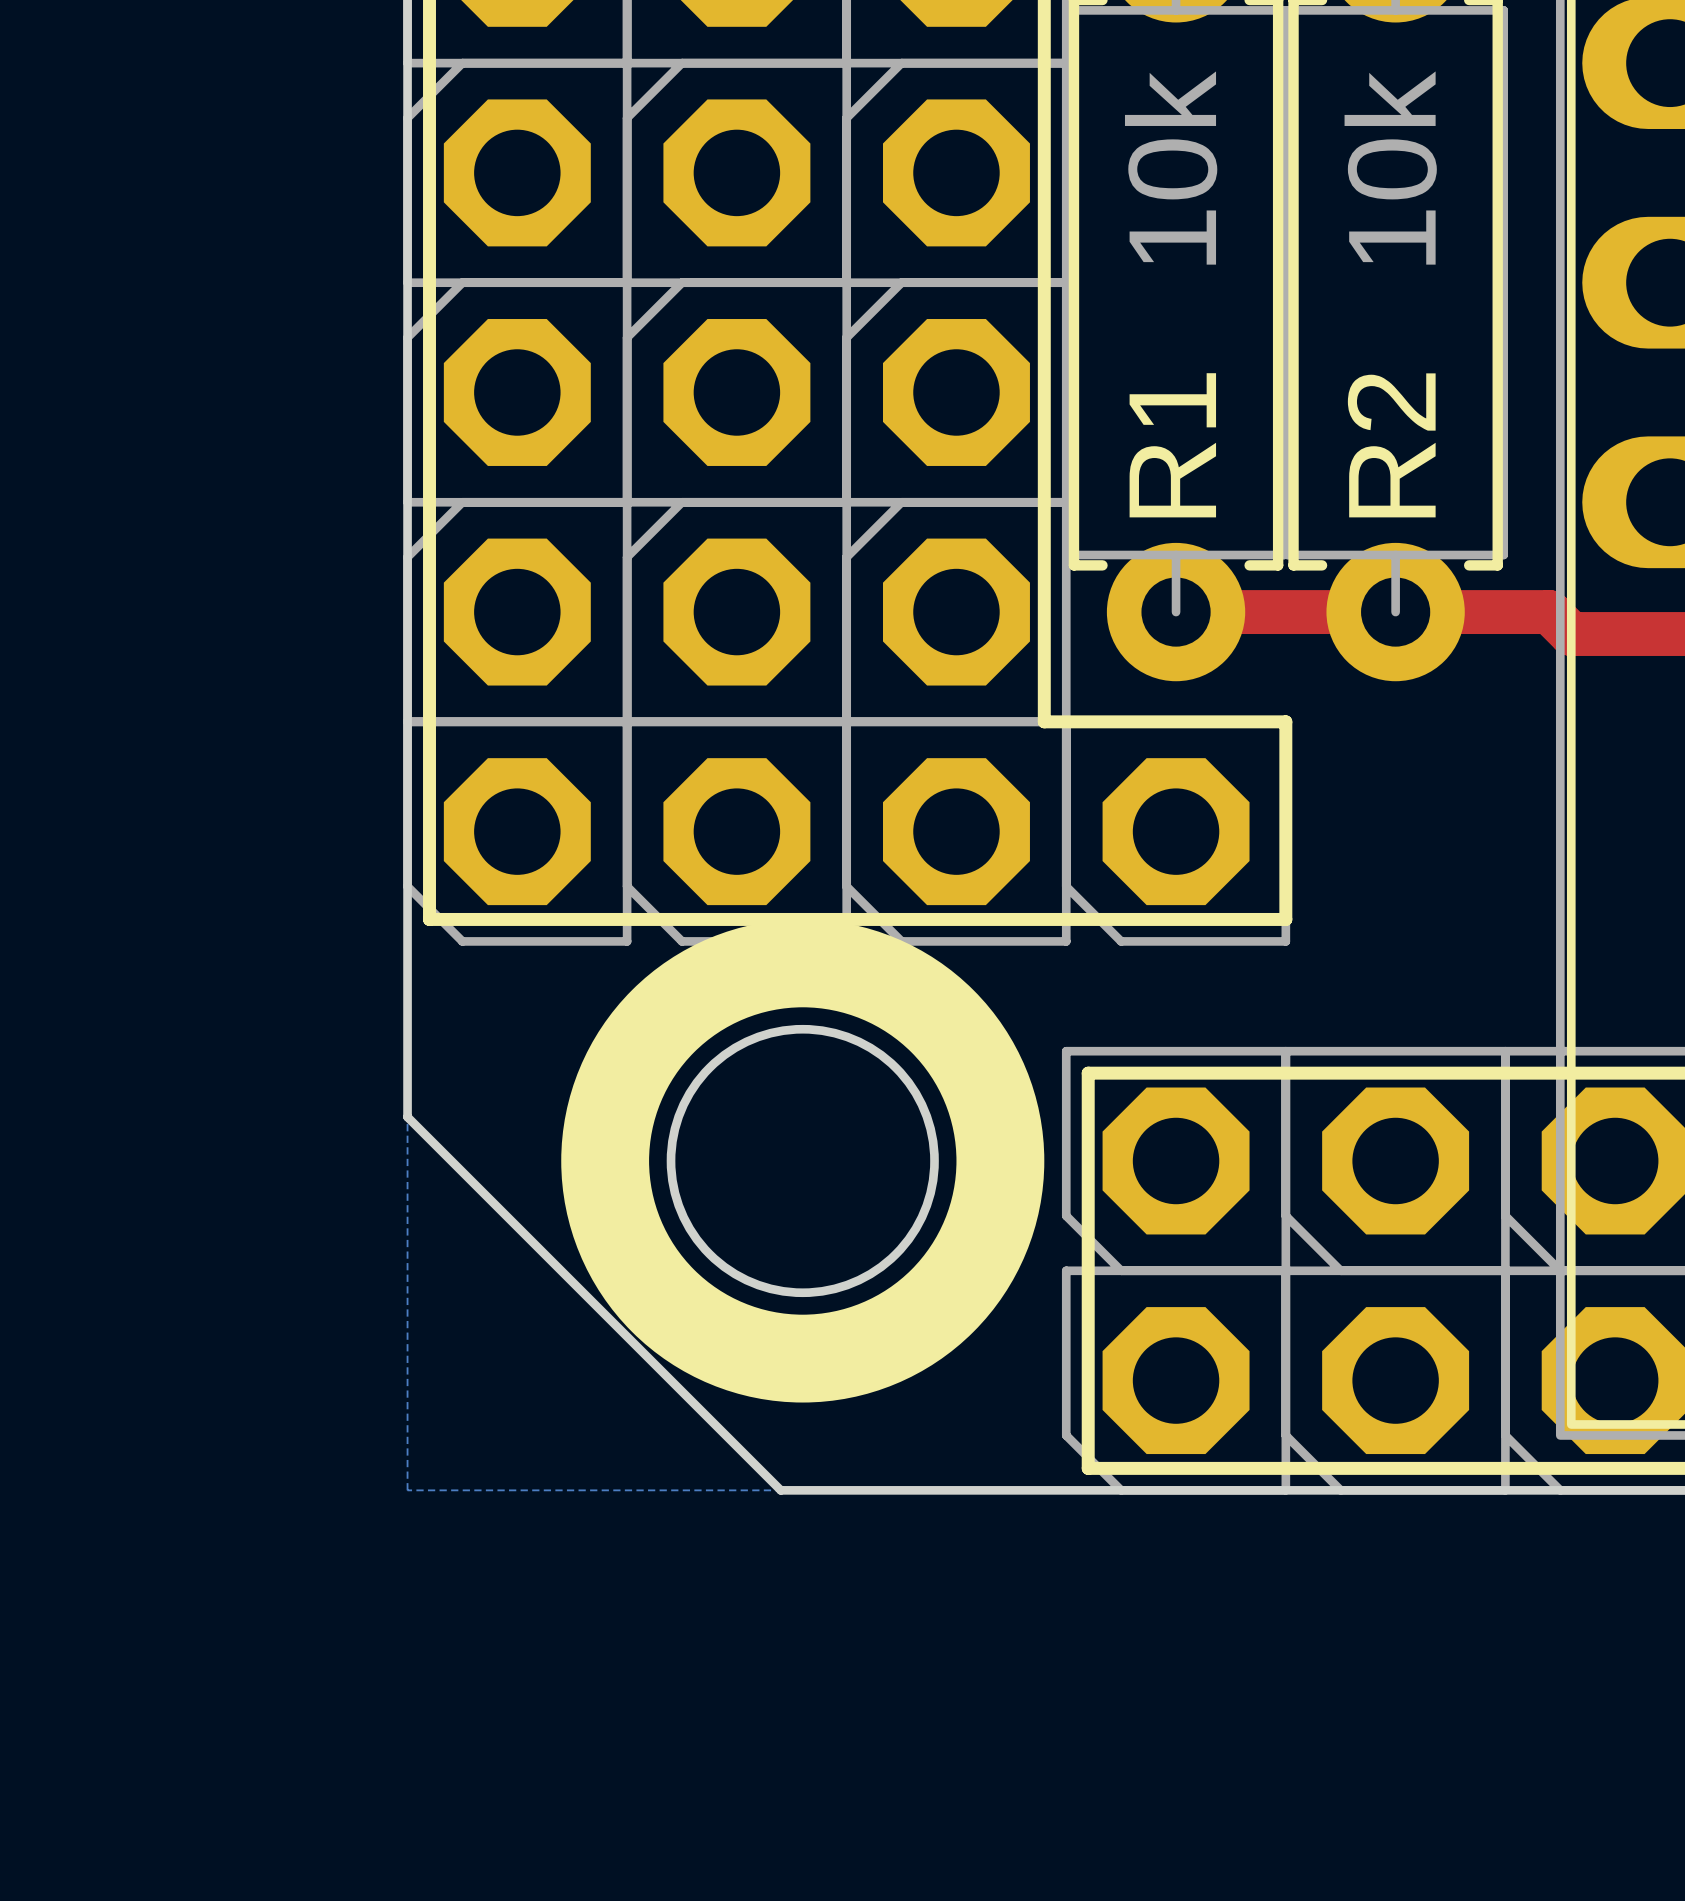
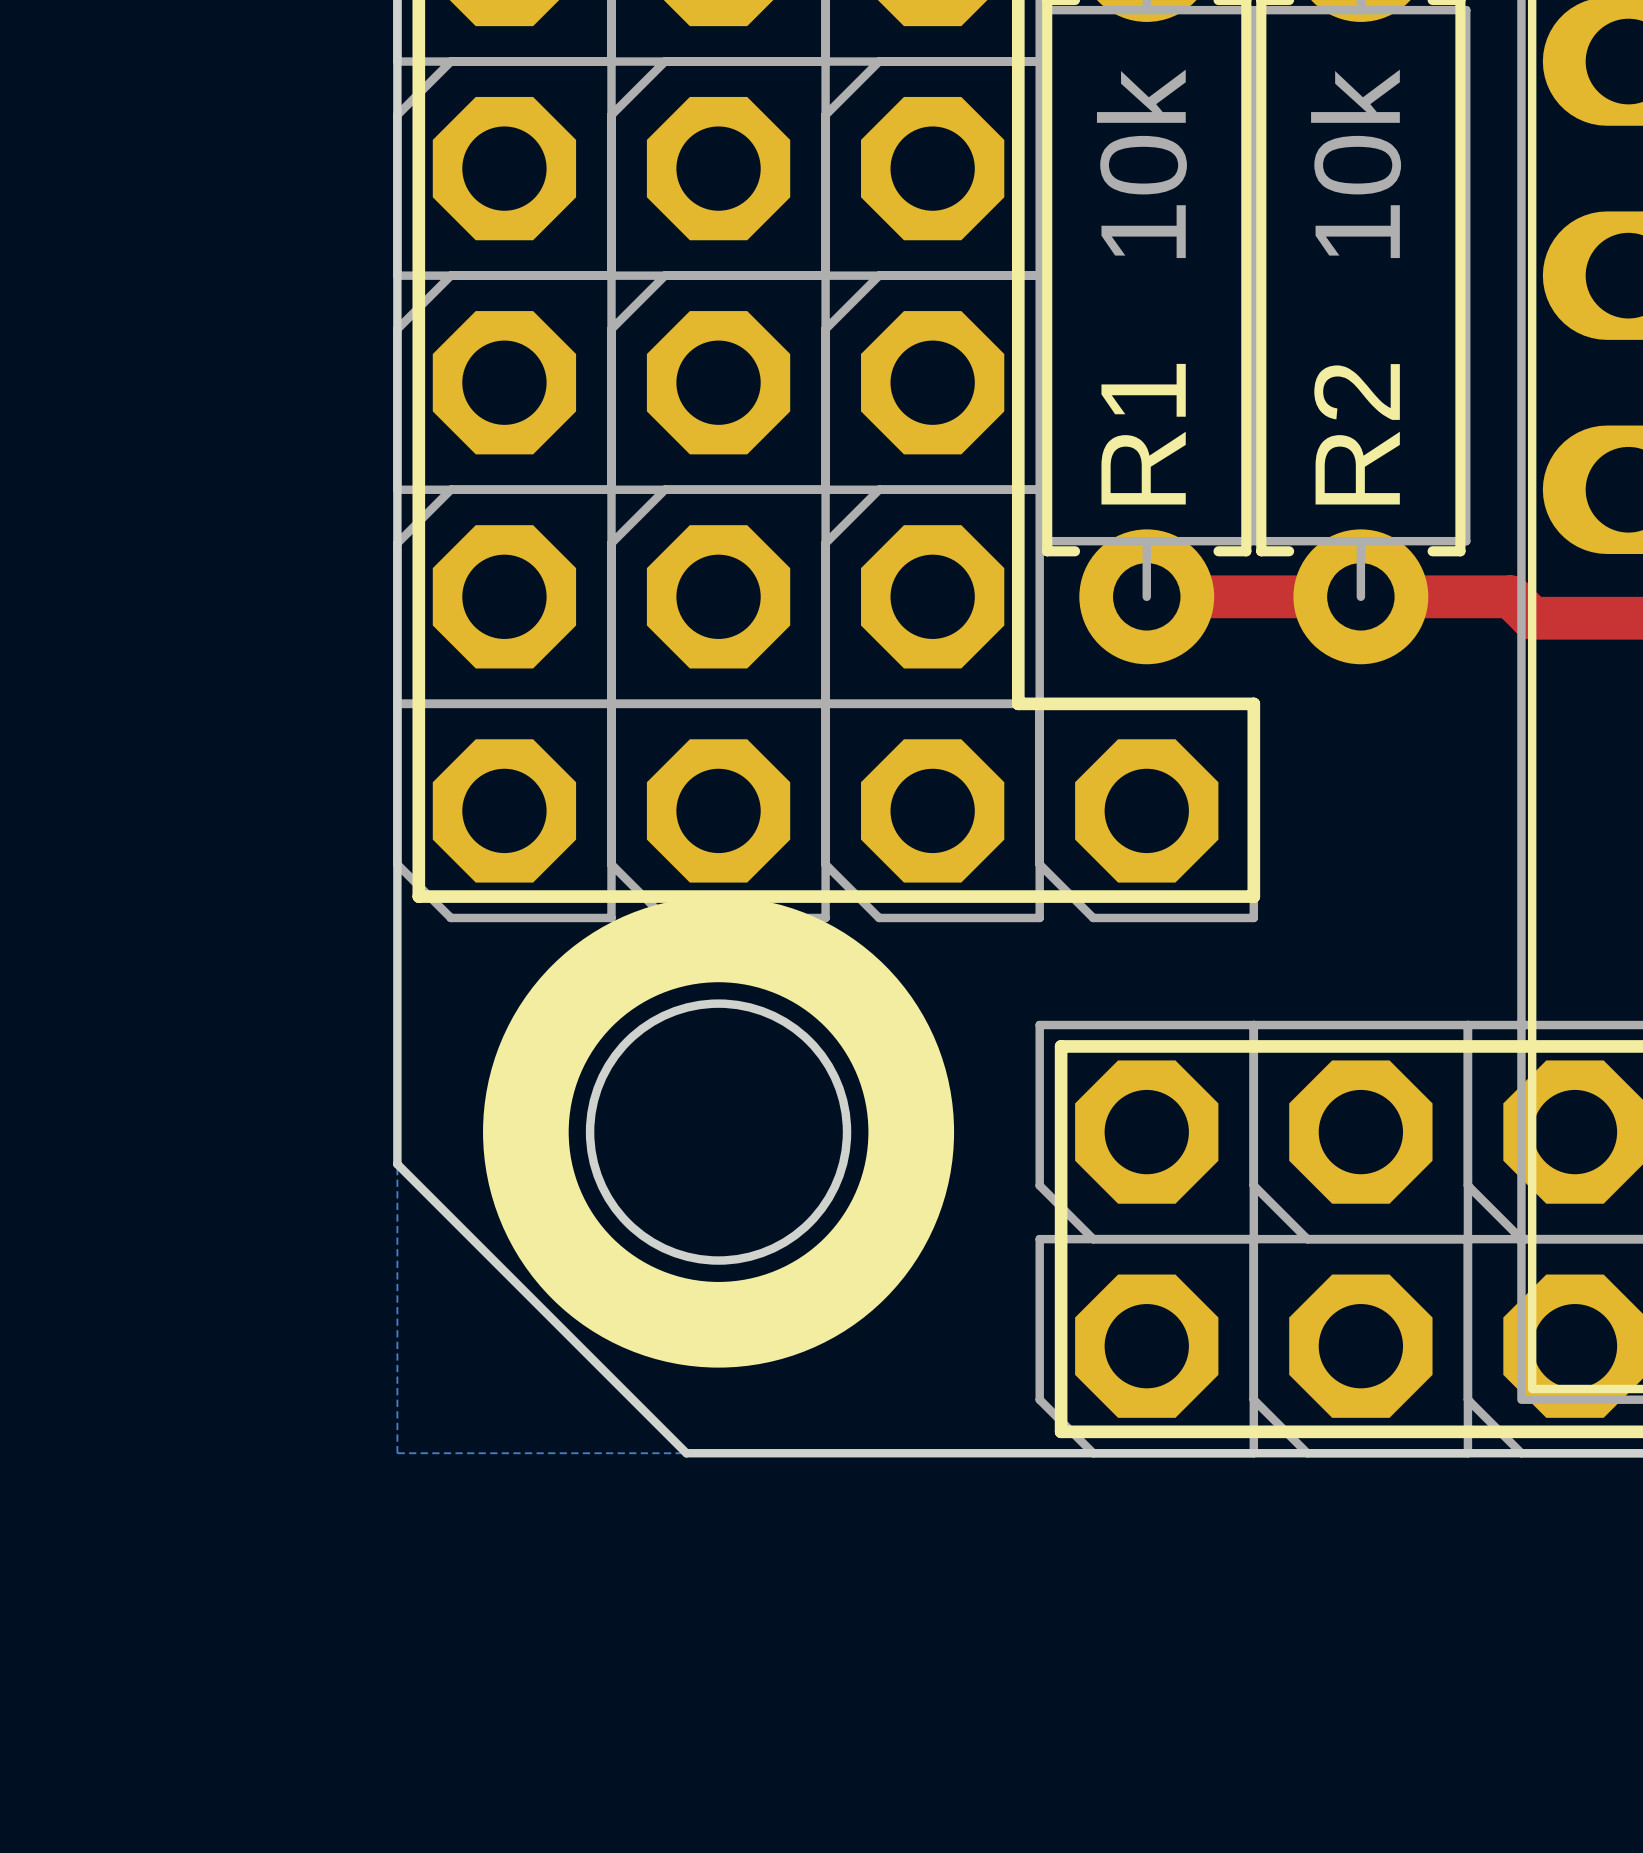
board edge: (407, 1117) (780, 1490) -> (397, 1089) (397, 1164) (686, 1453) (761, 1453)
drawing position: (802, 1160) -> (718, 1132)
round board edge position: (802, 1160) -> (718, 1132)

